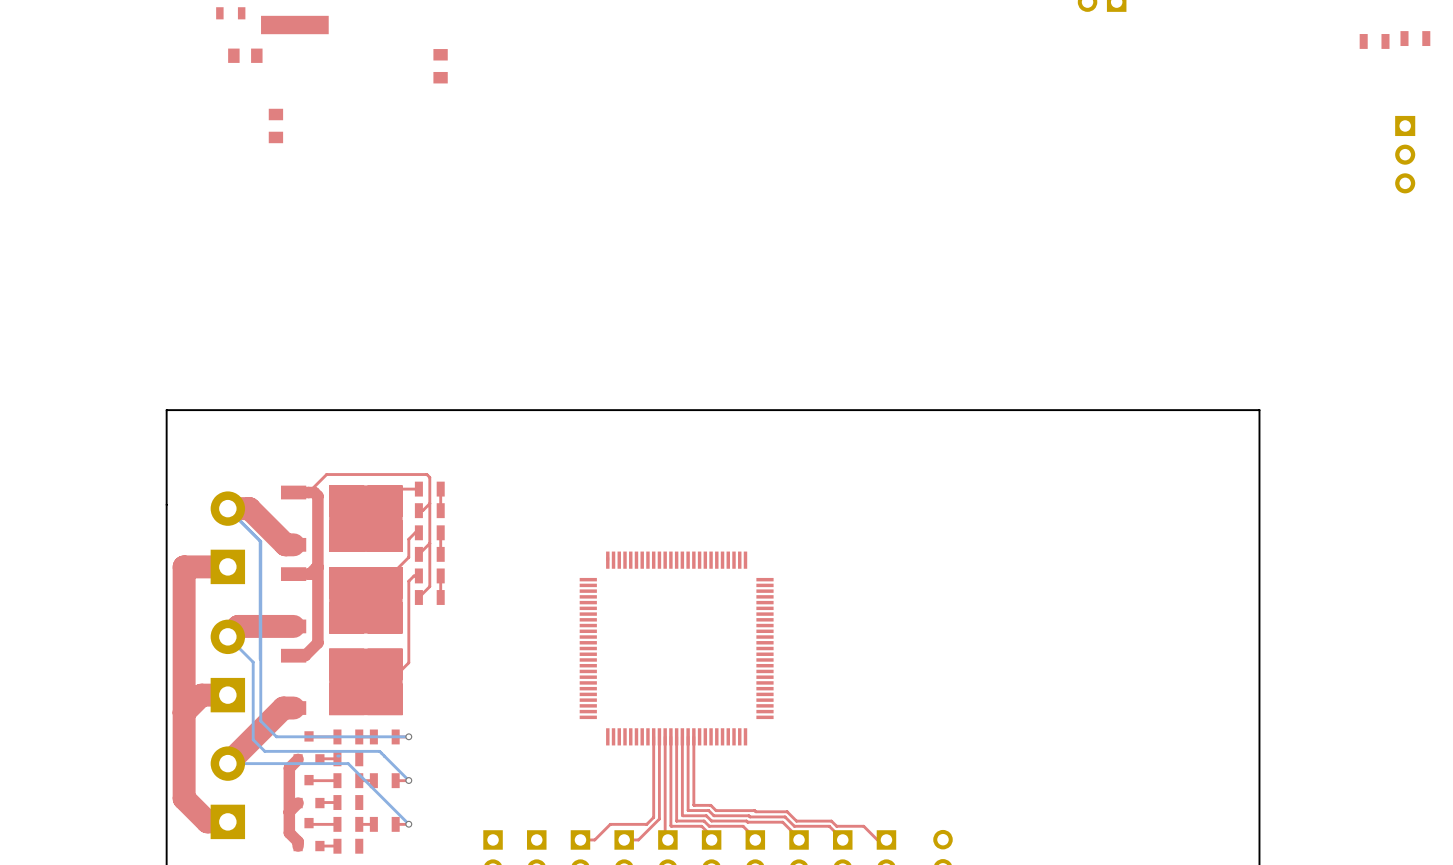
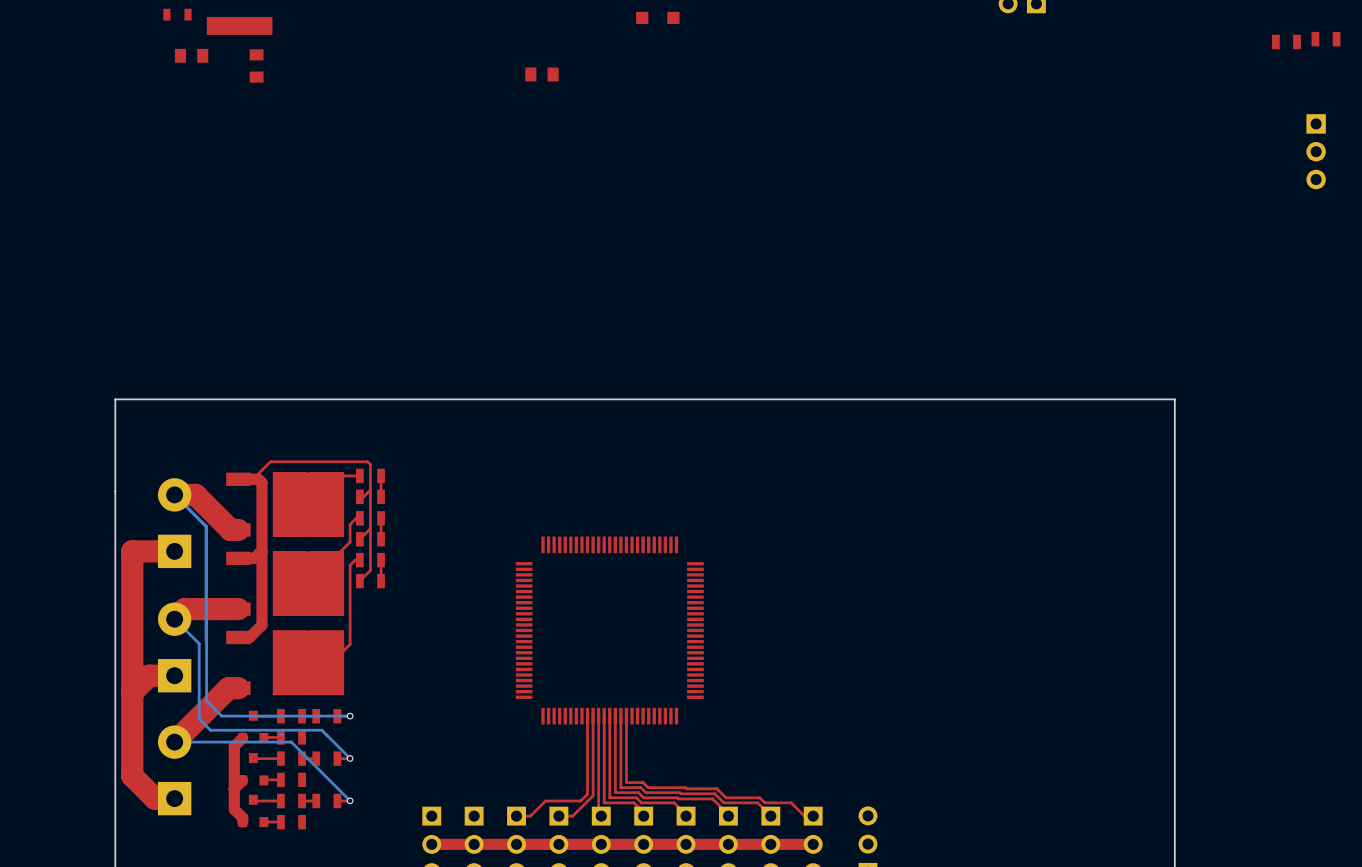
part: none -> (657, 17)
part: none -> (256, 65)
part: (440, 66) -> none
part: none -> (541, 74)
part: (275, 125) -> none

